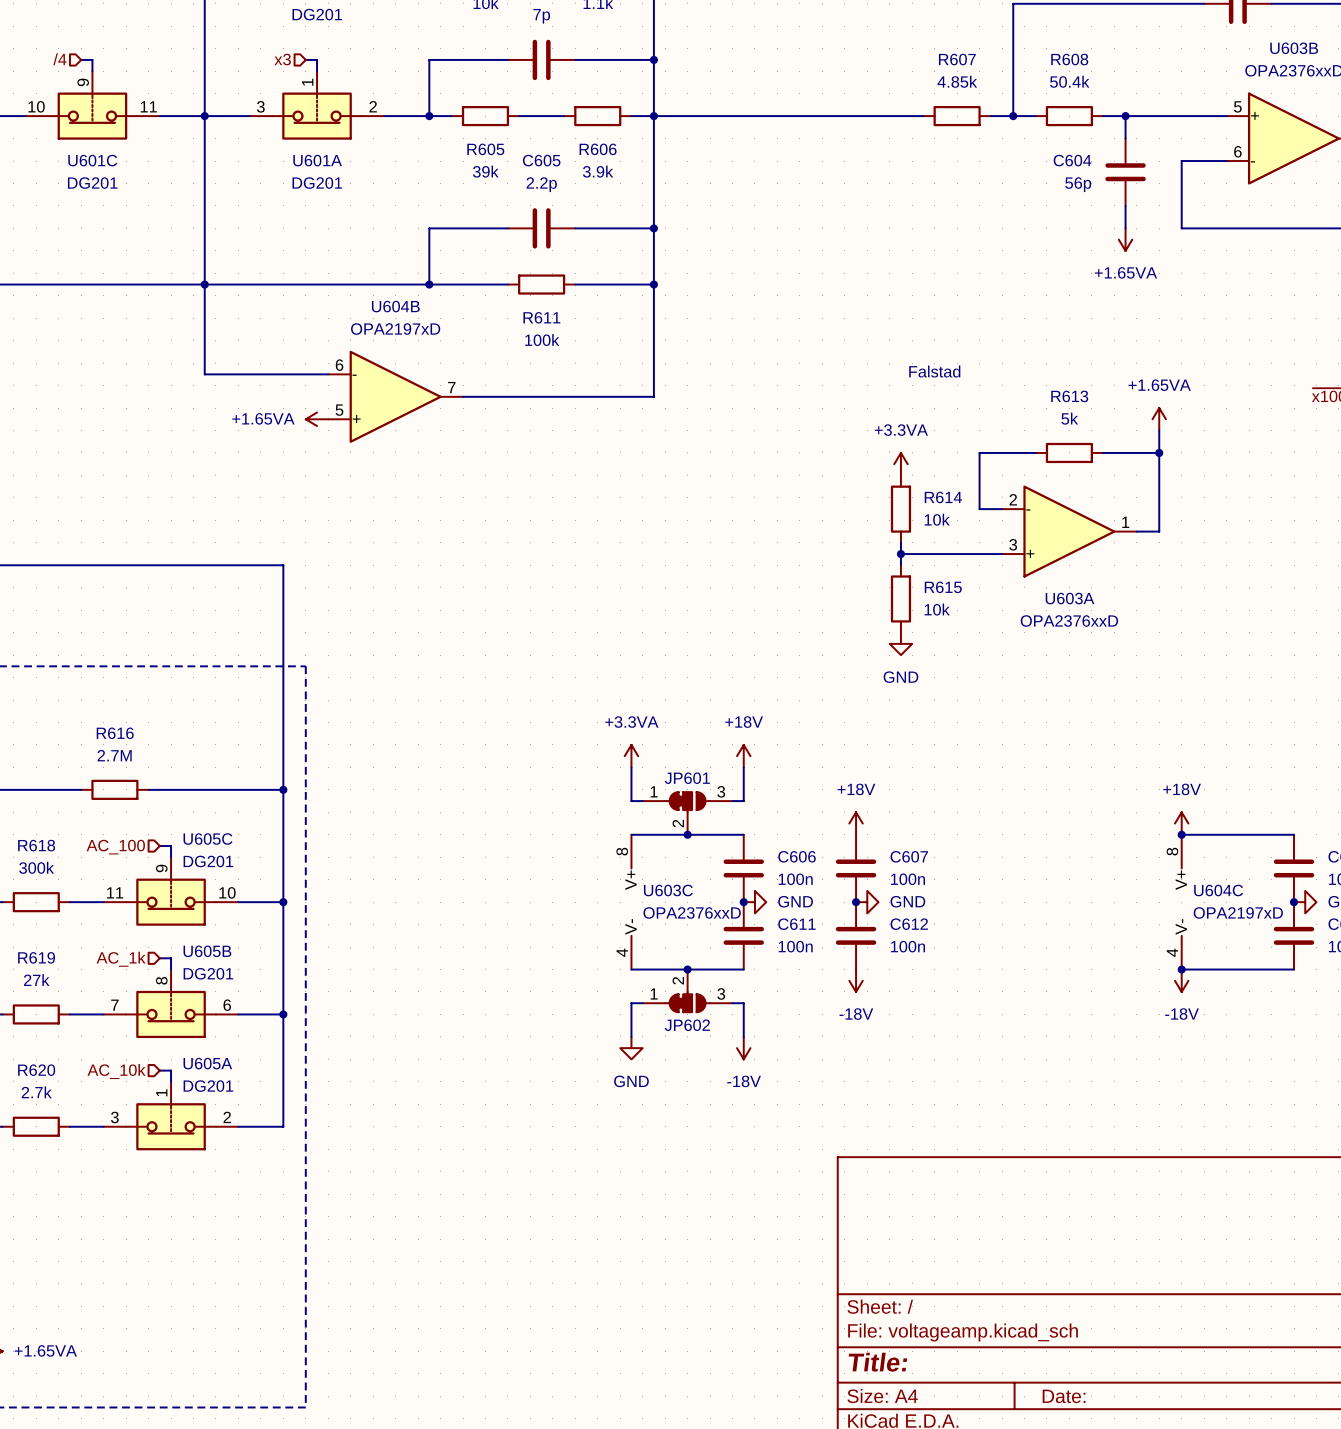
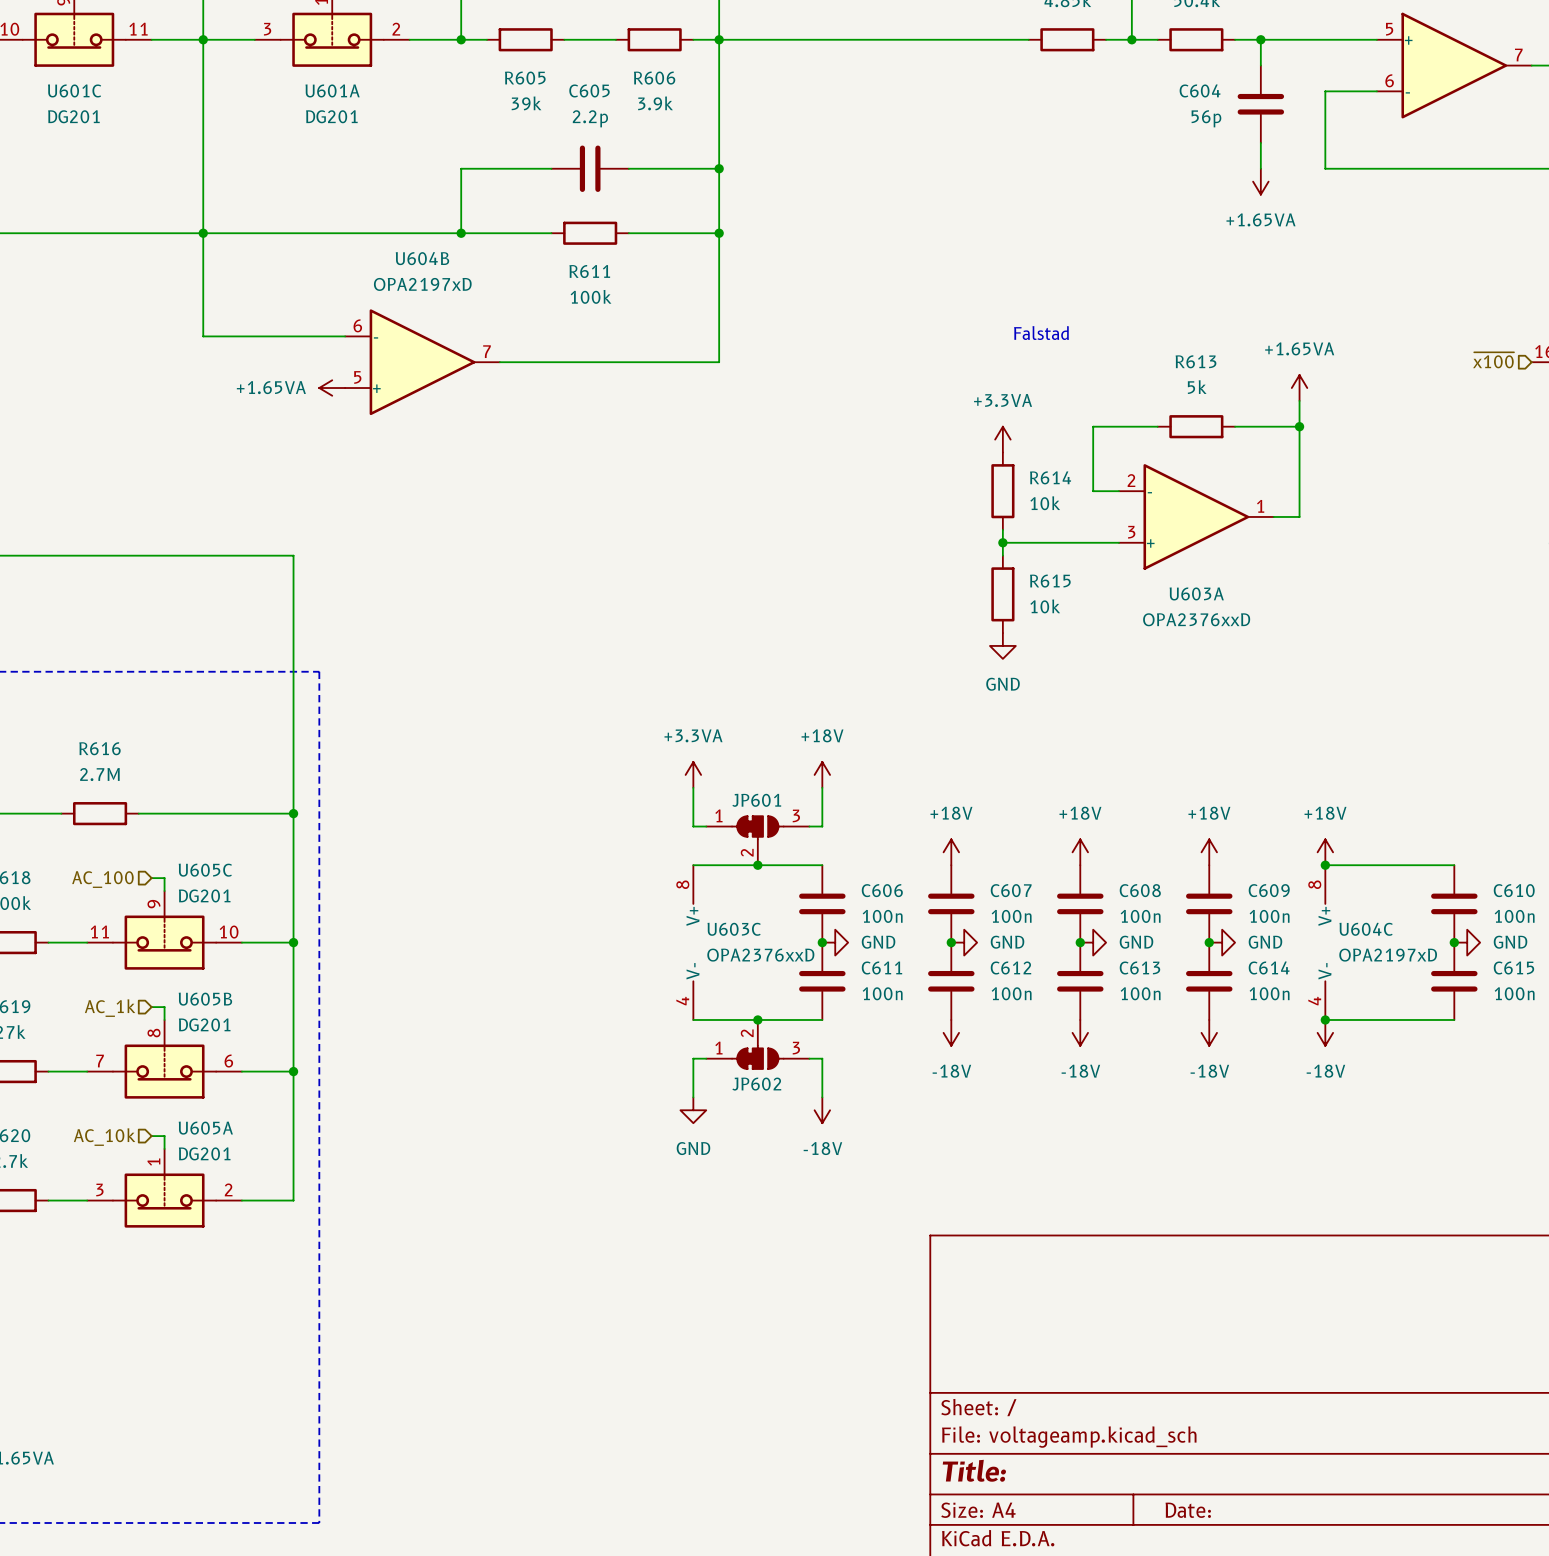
power symbol: none -> +18V (1080, 852)
power symbol: none -> +18V (1209, 852)
C608: none -> 100n (1080, 903)
C609: none -> 100n (1209, 903)
junction: none -> (1080, 942)
power symbol: none -> GND (1093, 942)
junction: none -> (1209, 942)
power symbol: none -> GND (1222, 942)
C613: none -> 100n (1080, 981)
C614: none -> 100n (1209, 981)
power symbol: none -> -18V (1080, 1032)
power symbol: none -> -18V (1209, 1032)

